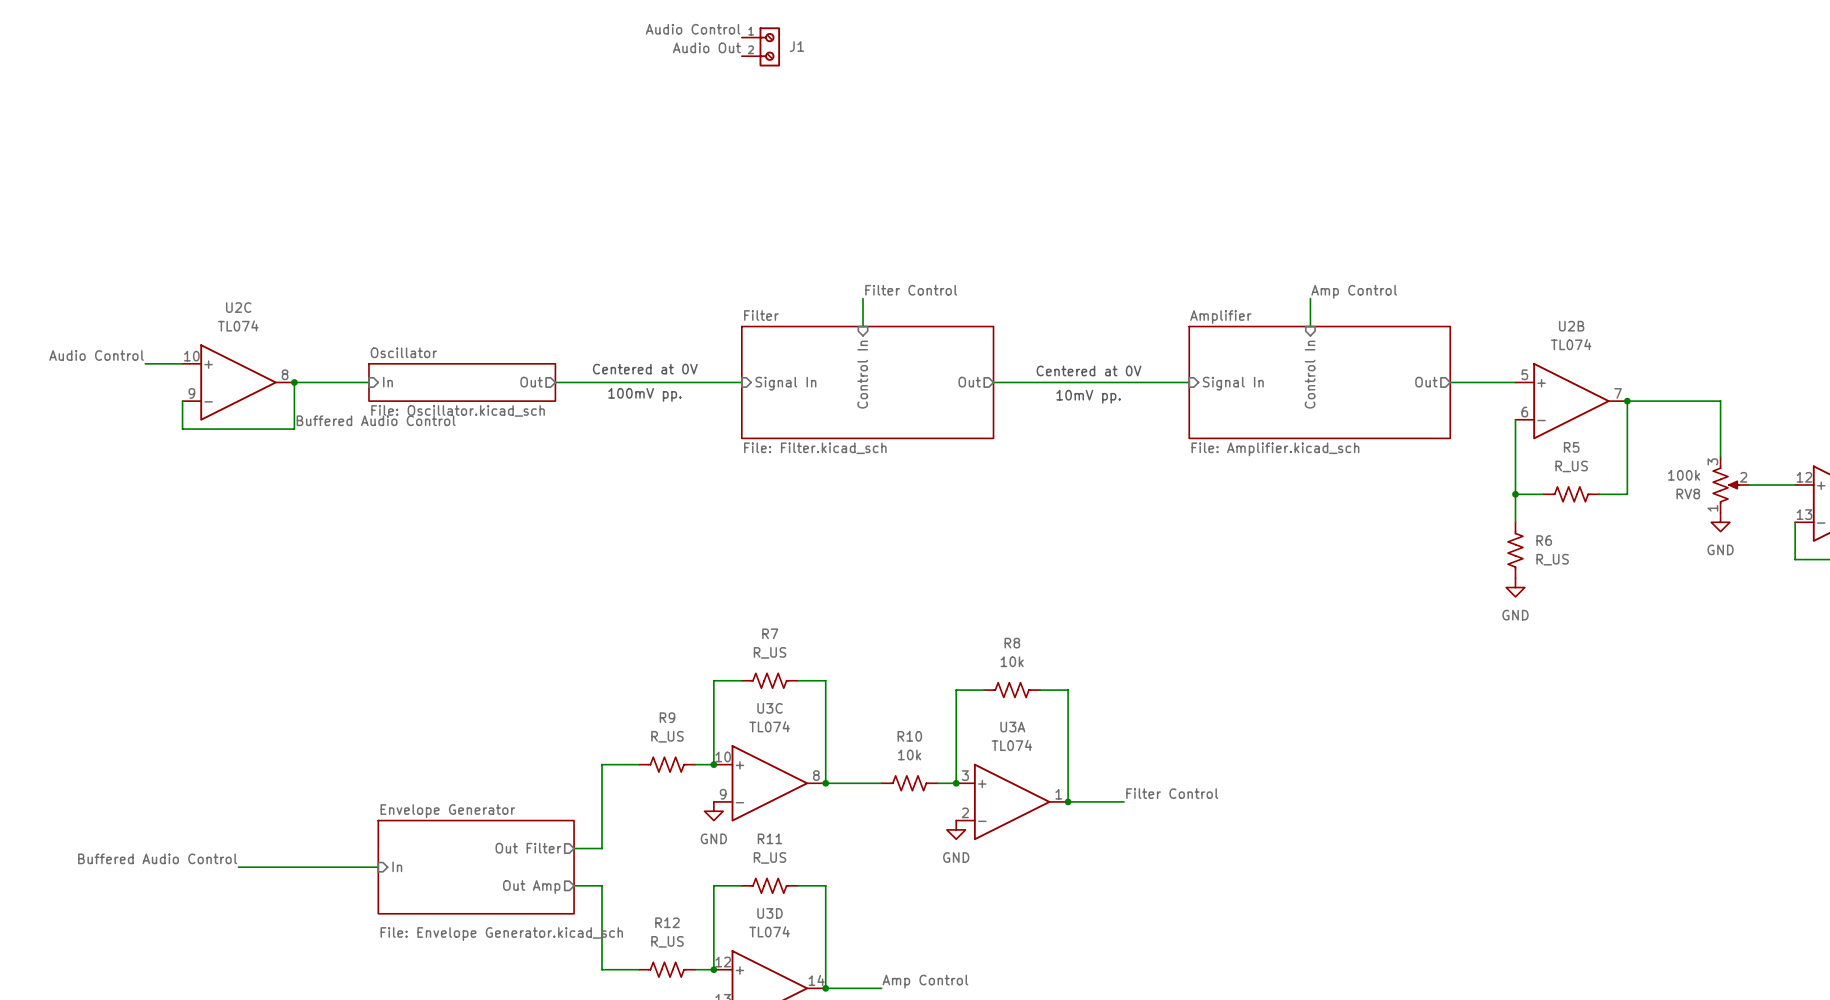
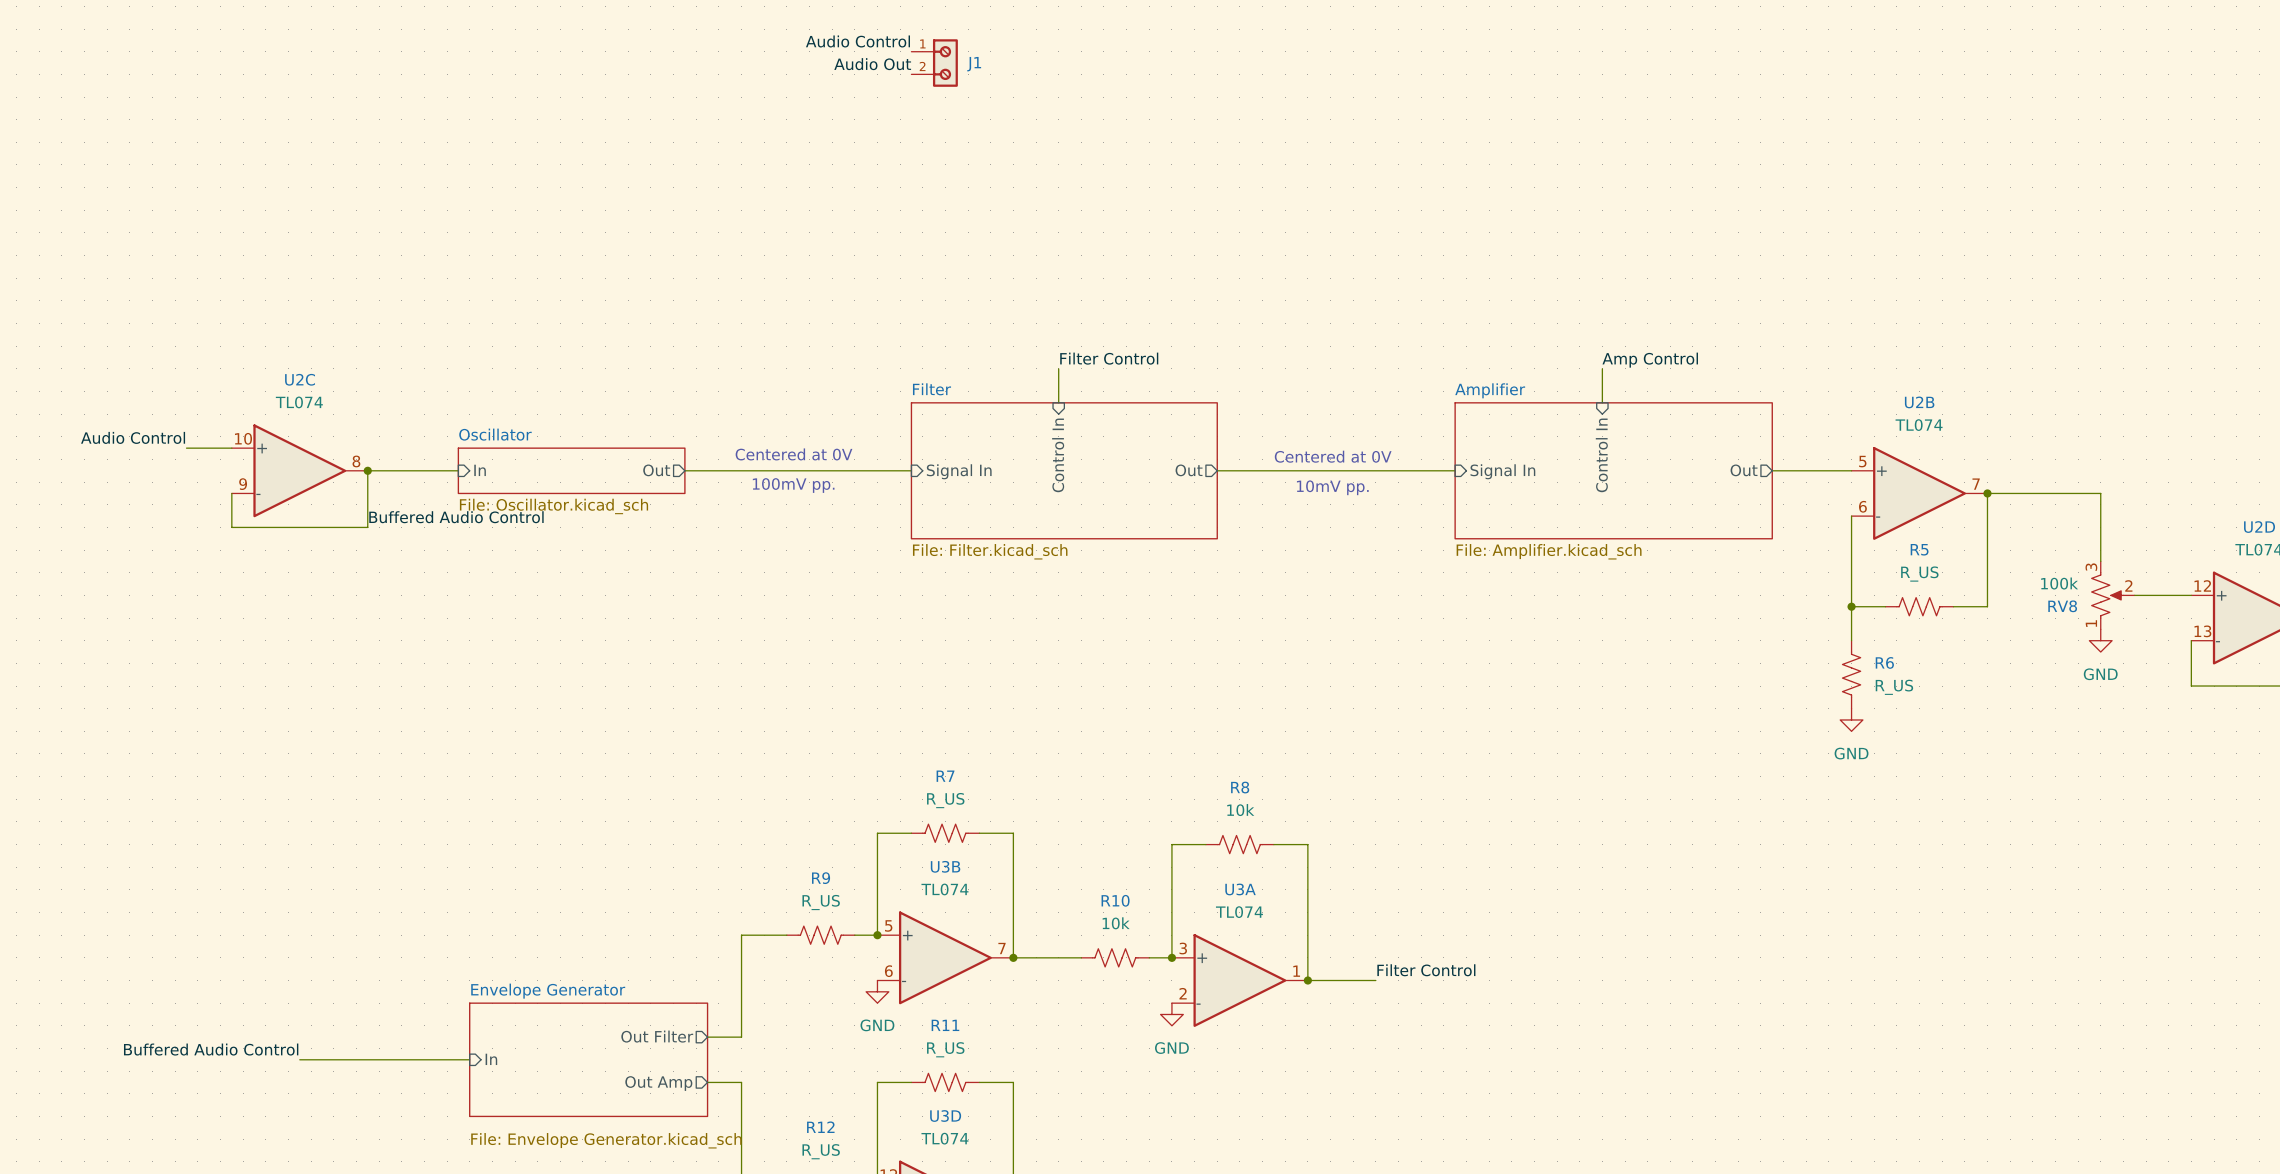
U3C name: U3C (770, 708) -> U3B (945, 866)
U3C pin number: 10 (723, 756) -> 5 (888, 925)
U3C pin number: 8 (816, 775) -> 7 (1002, 948)
U3C pin number: 9 (723, 794) -> 6 (888, 971)

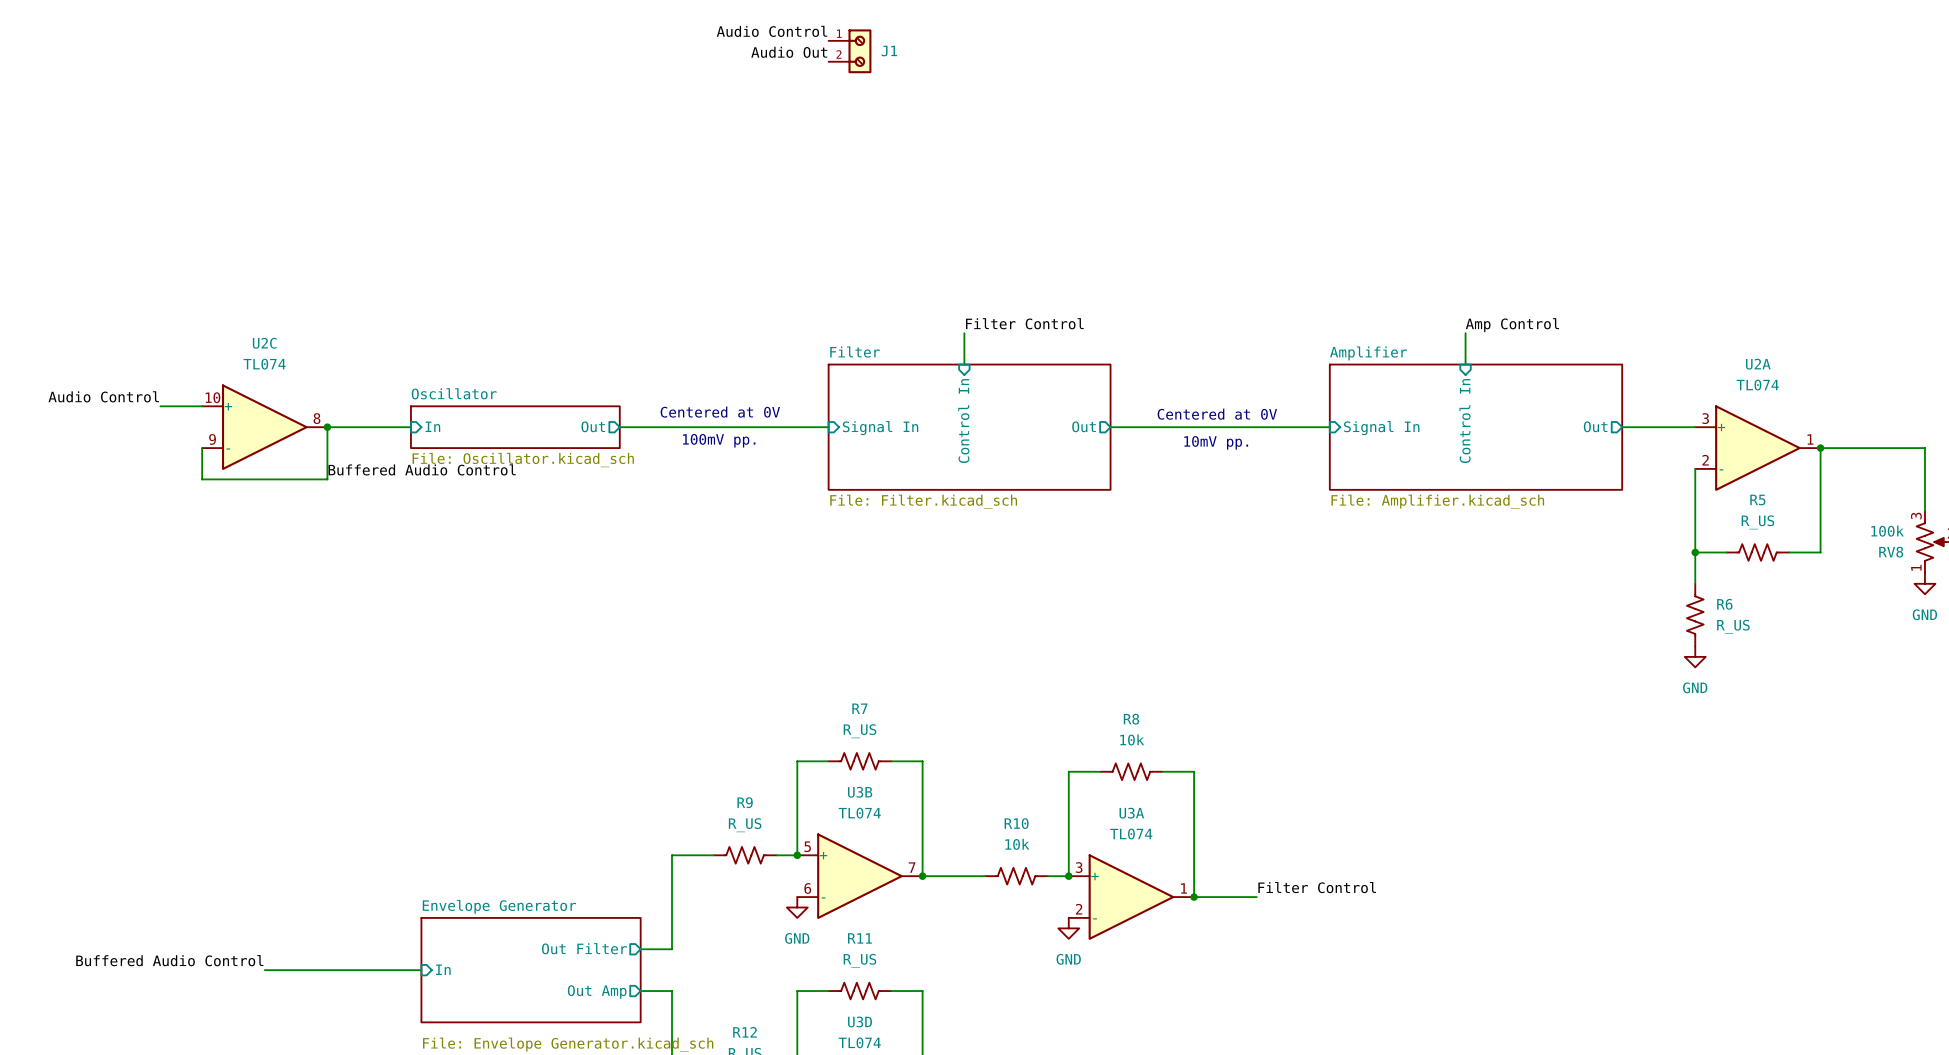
U2B name: U2B (1919, 402) -> U2A (1758, 364)
U2B pin number: 5 (1862, 461) -> 3 (1705, 418)
U2B pin number: 7 (1976, 484) -> 1 (1810, 439)
U2B pin number: 6 (1862, 506) -> 2 (1705, 460)

